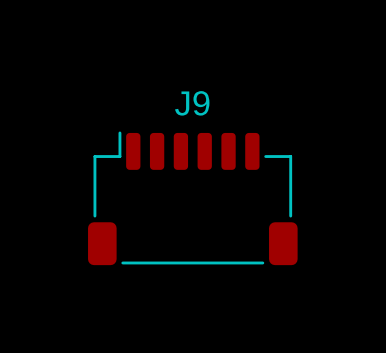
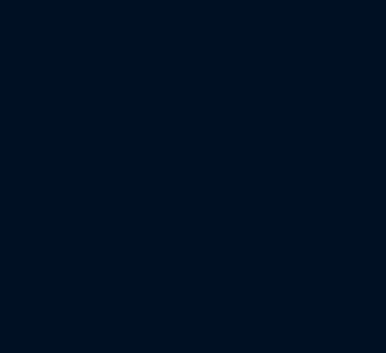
J9: (192, 198) -> none

